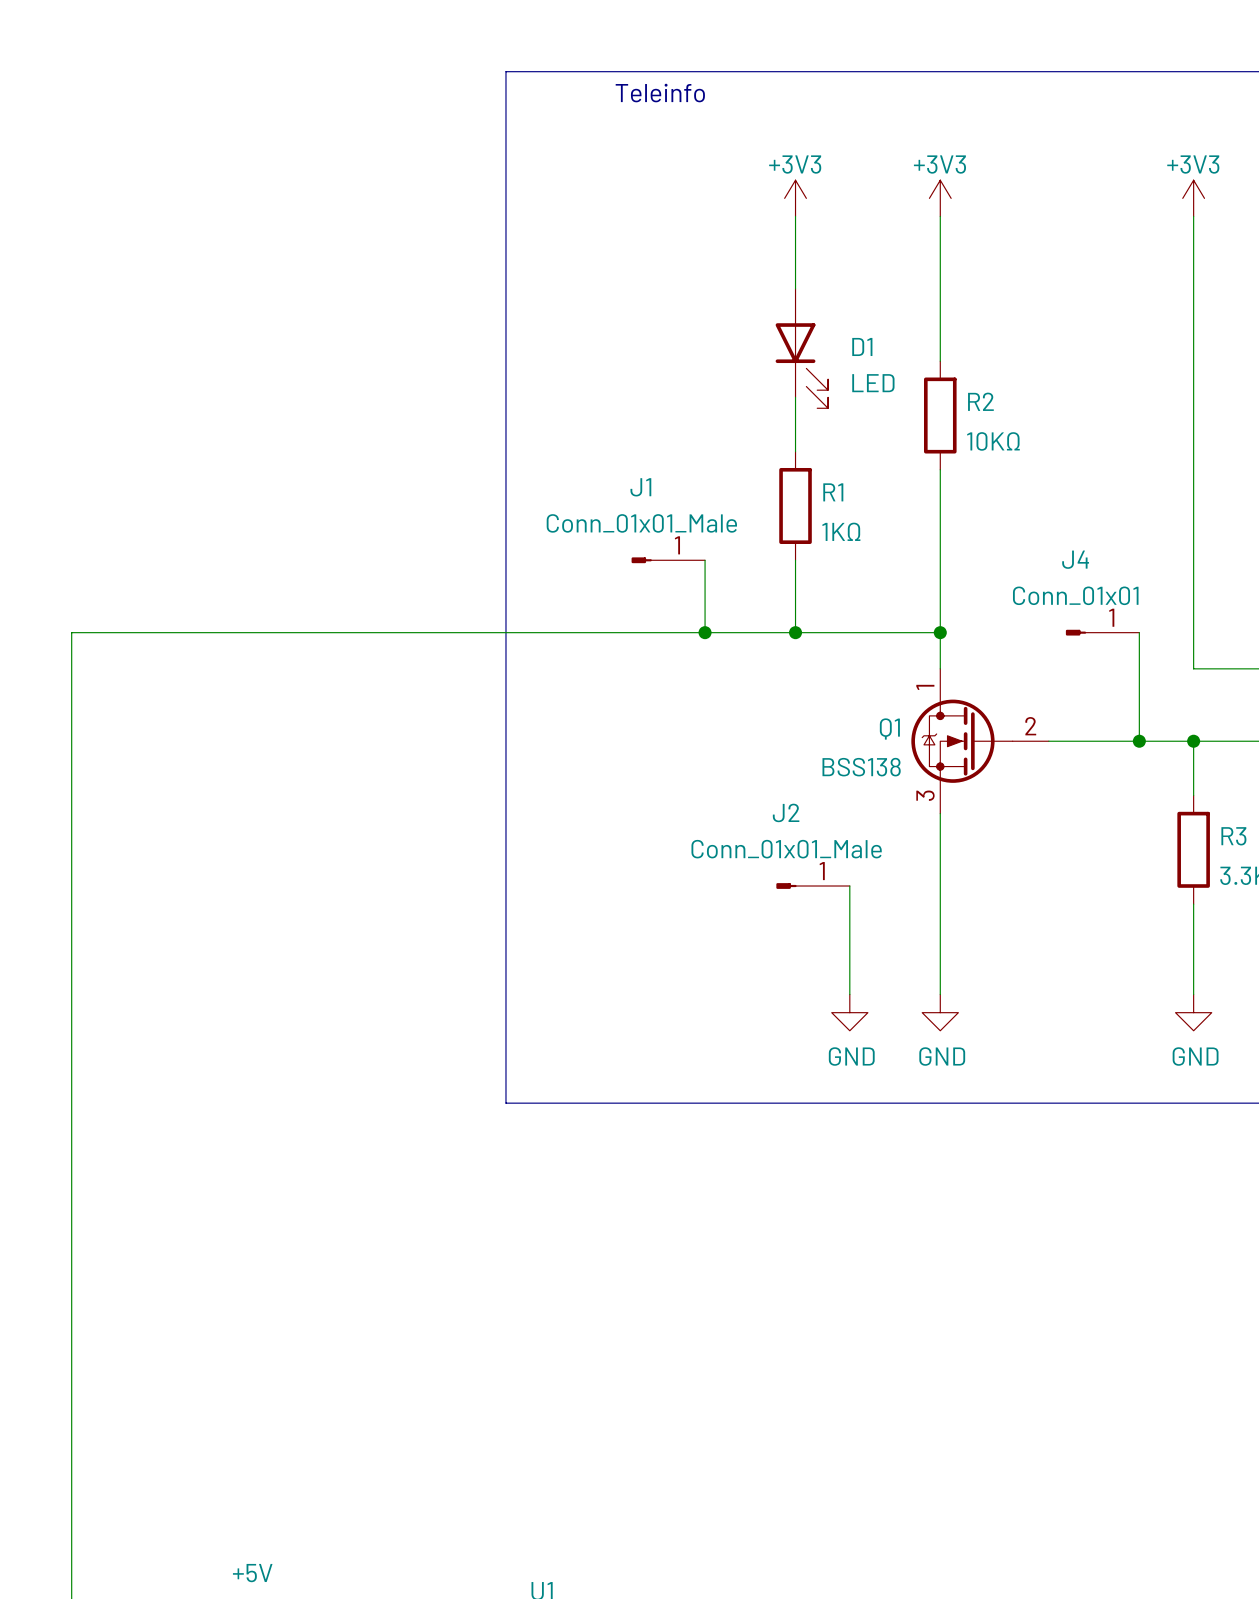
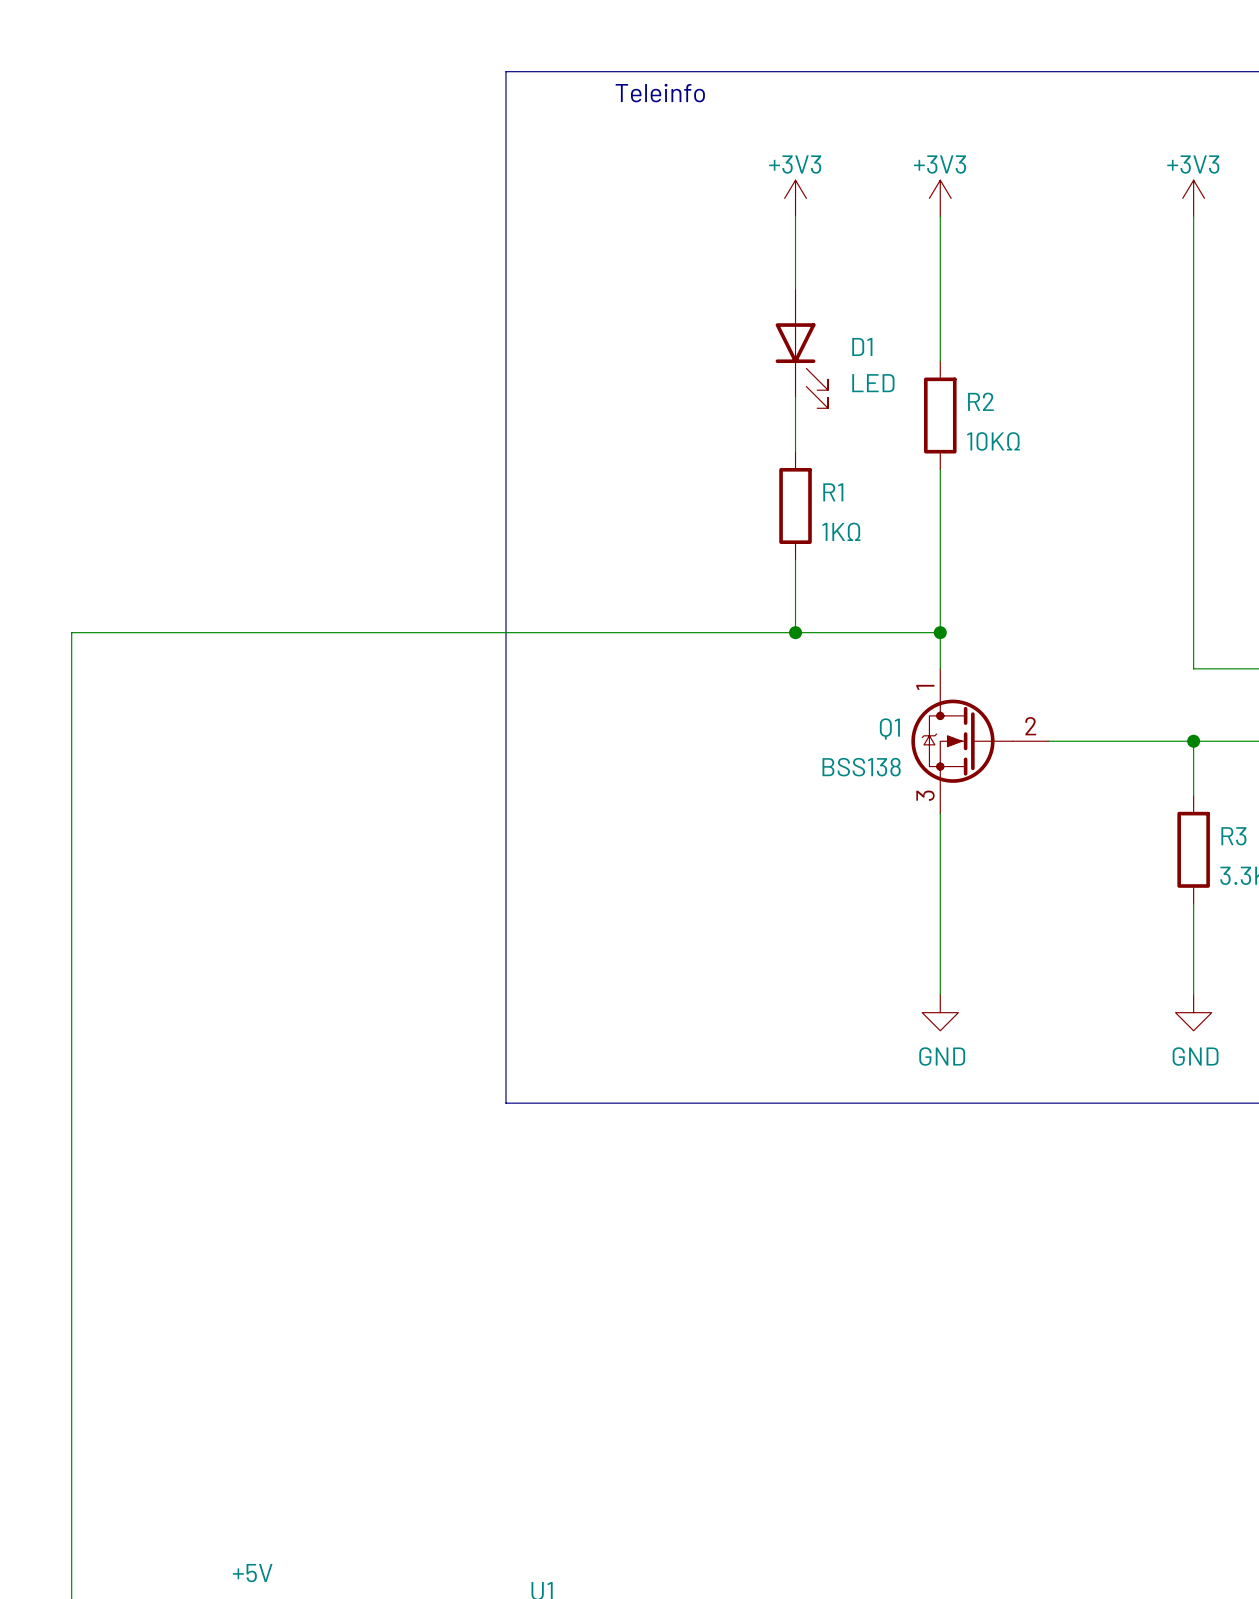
J1: Conn_01x01_Male (668, 560) -> none
wire: (705, 560) (705, 632) -> none
junction: (705, 632) -> none
J4: Conn_01x01 (1102, 632) -> none
wire: (1139, 632) (1139, 741) -> none
junction: (1139, 741) -> none
J2: Conn_01x01_Male (813, 886) -> none
wire: (849, 886) (849, 994) -> none
power symbol: GND (849, 1012) -> none

